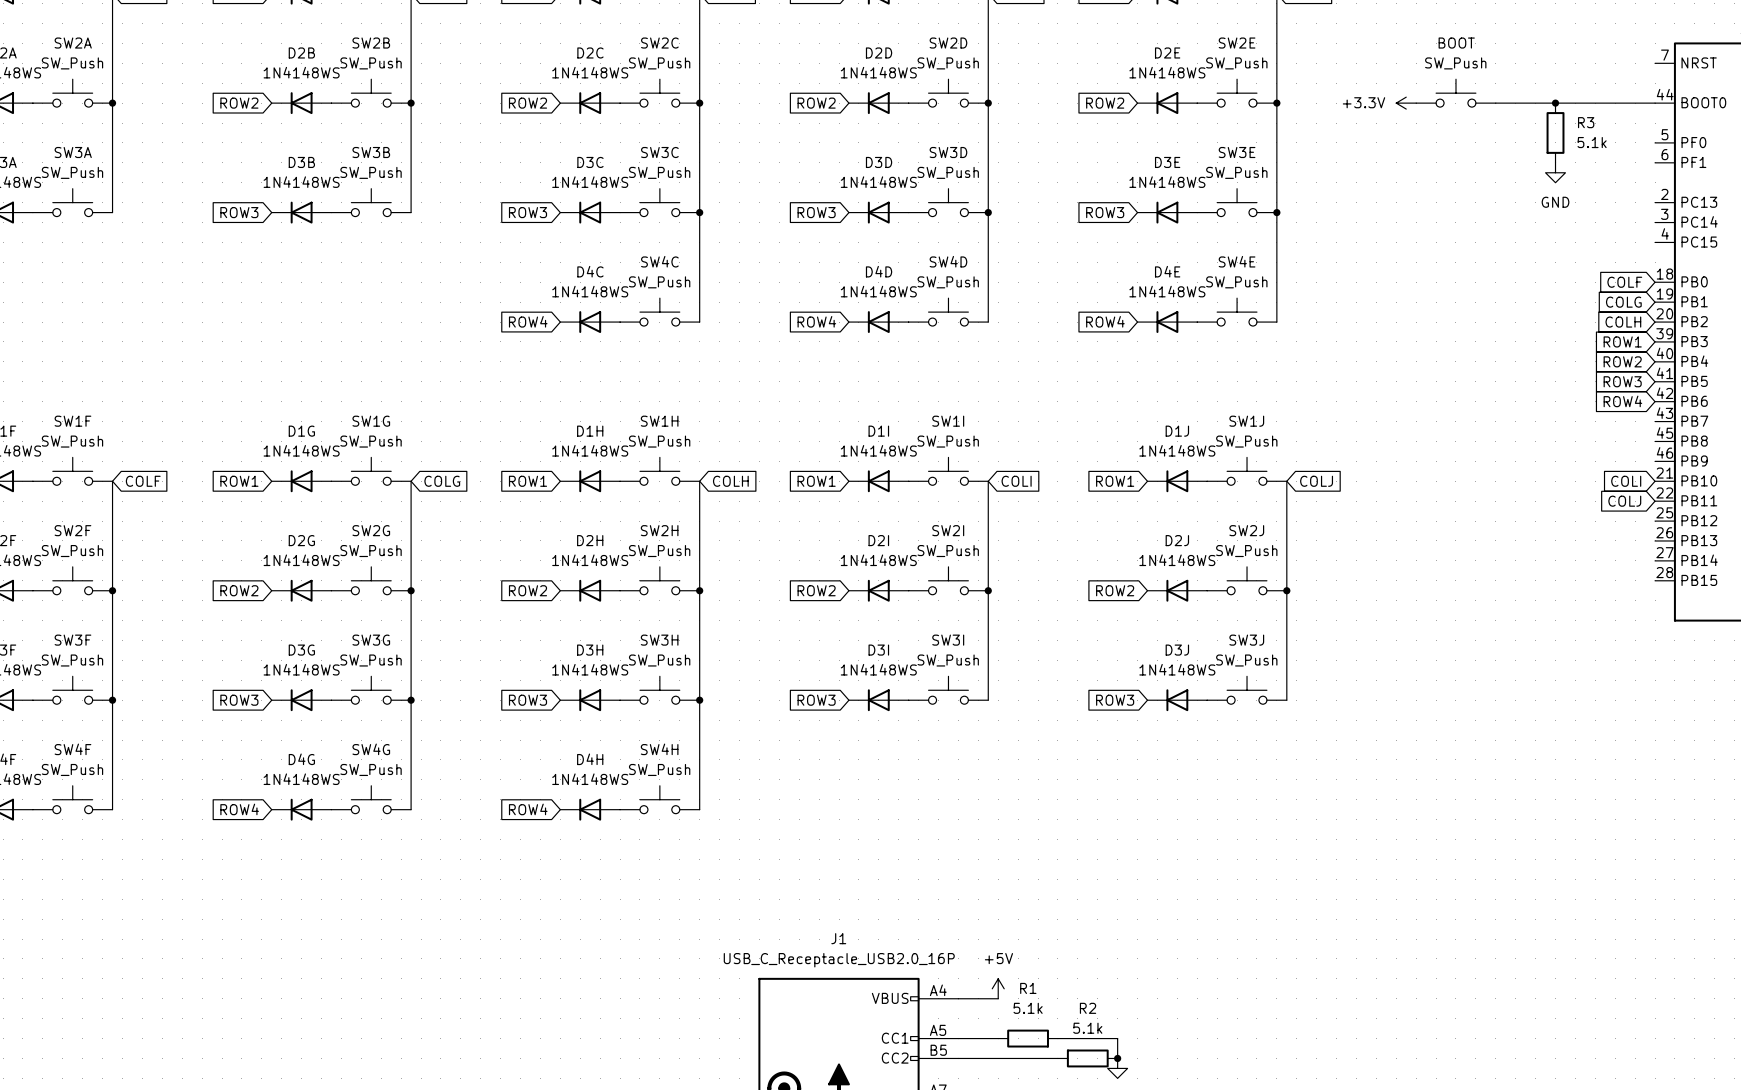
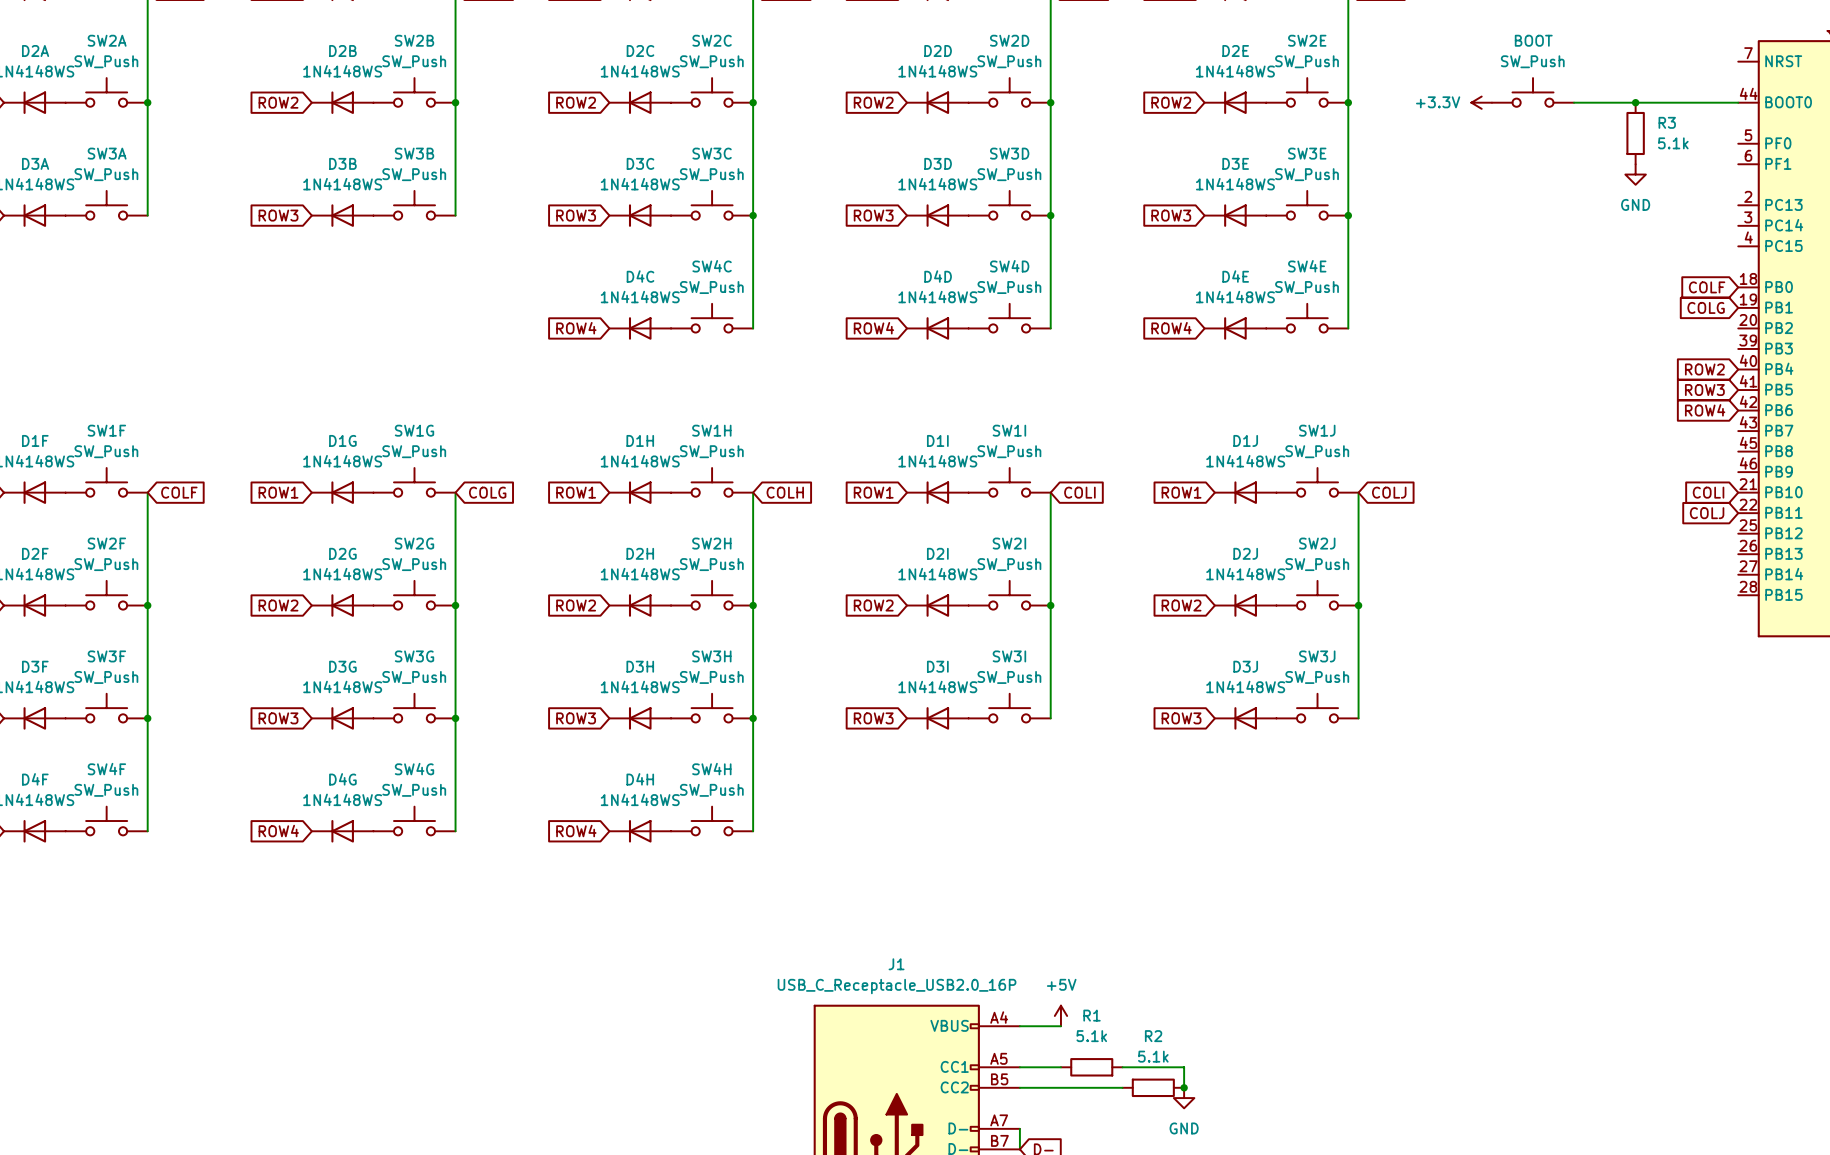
global label: COLH (1623, 322) -> none
global label: ROW1 (1622, 341) -> none

